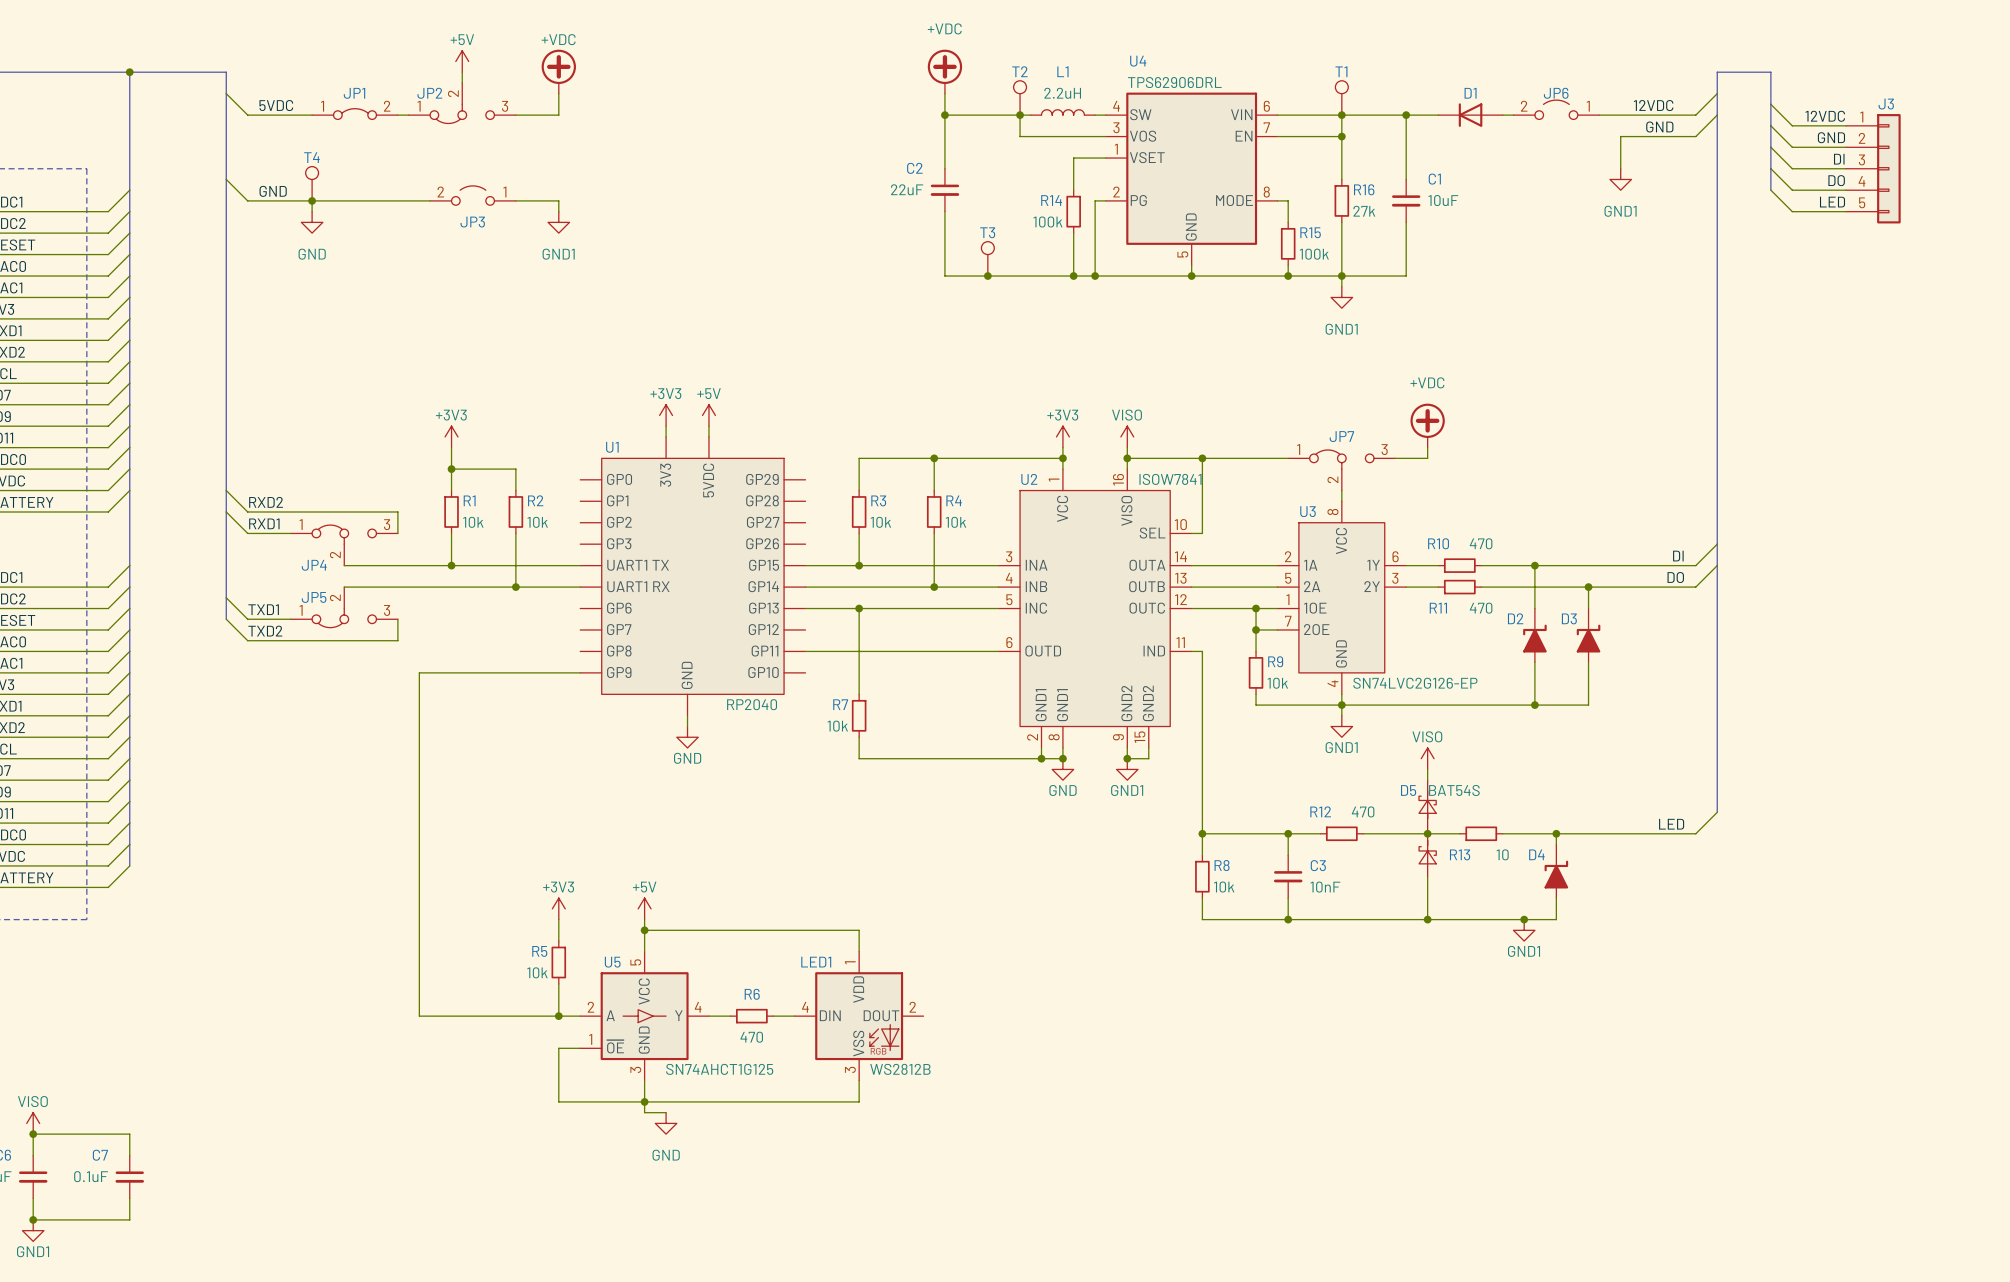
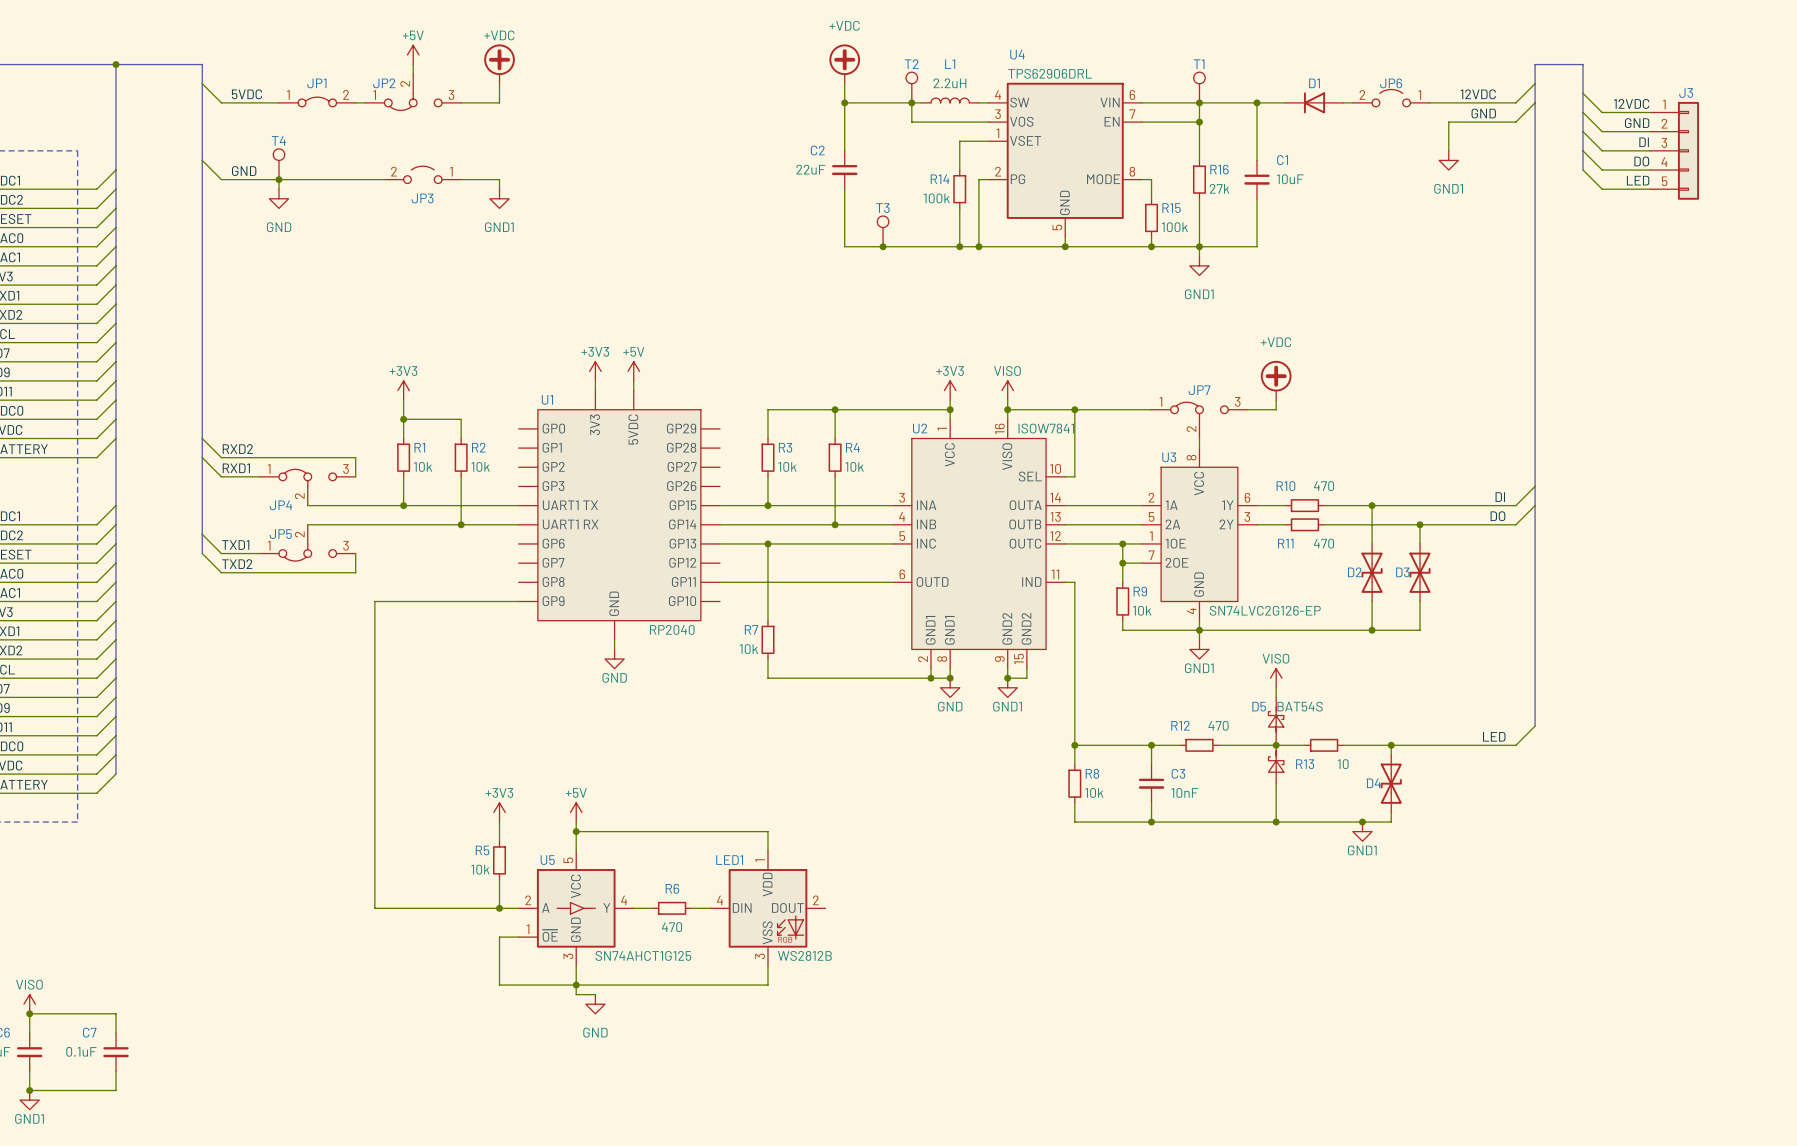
D2 symbol: [1523, 608, 1547, 663] -> [1361, 543, 1383, 602]
D3 symbol: [1576, 608, 1601, 663] -> [1409, 543, 1431, 602]
D4 symbol: [1544, 844, 1569, 899] -> [1380, 754, 1402, 813]

